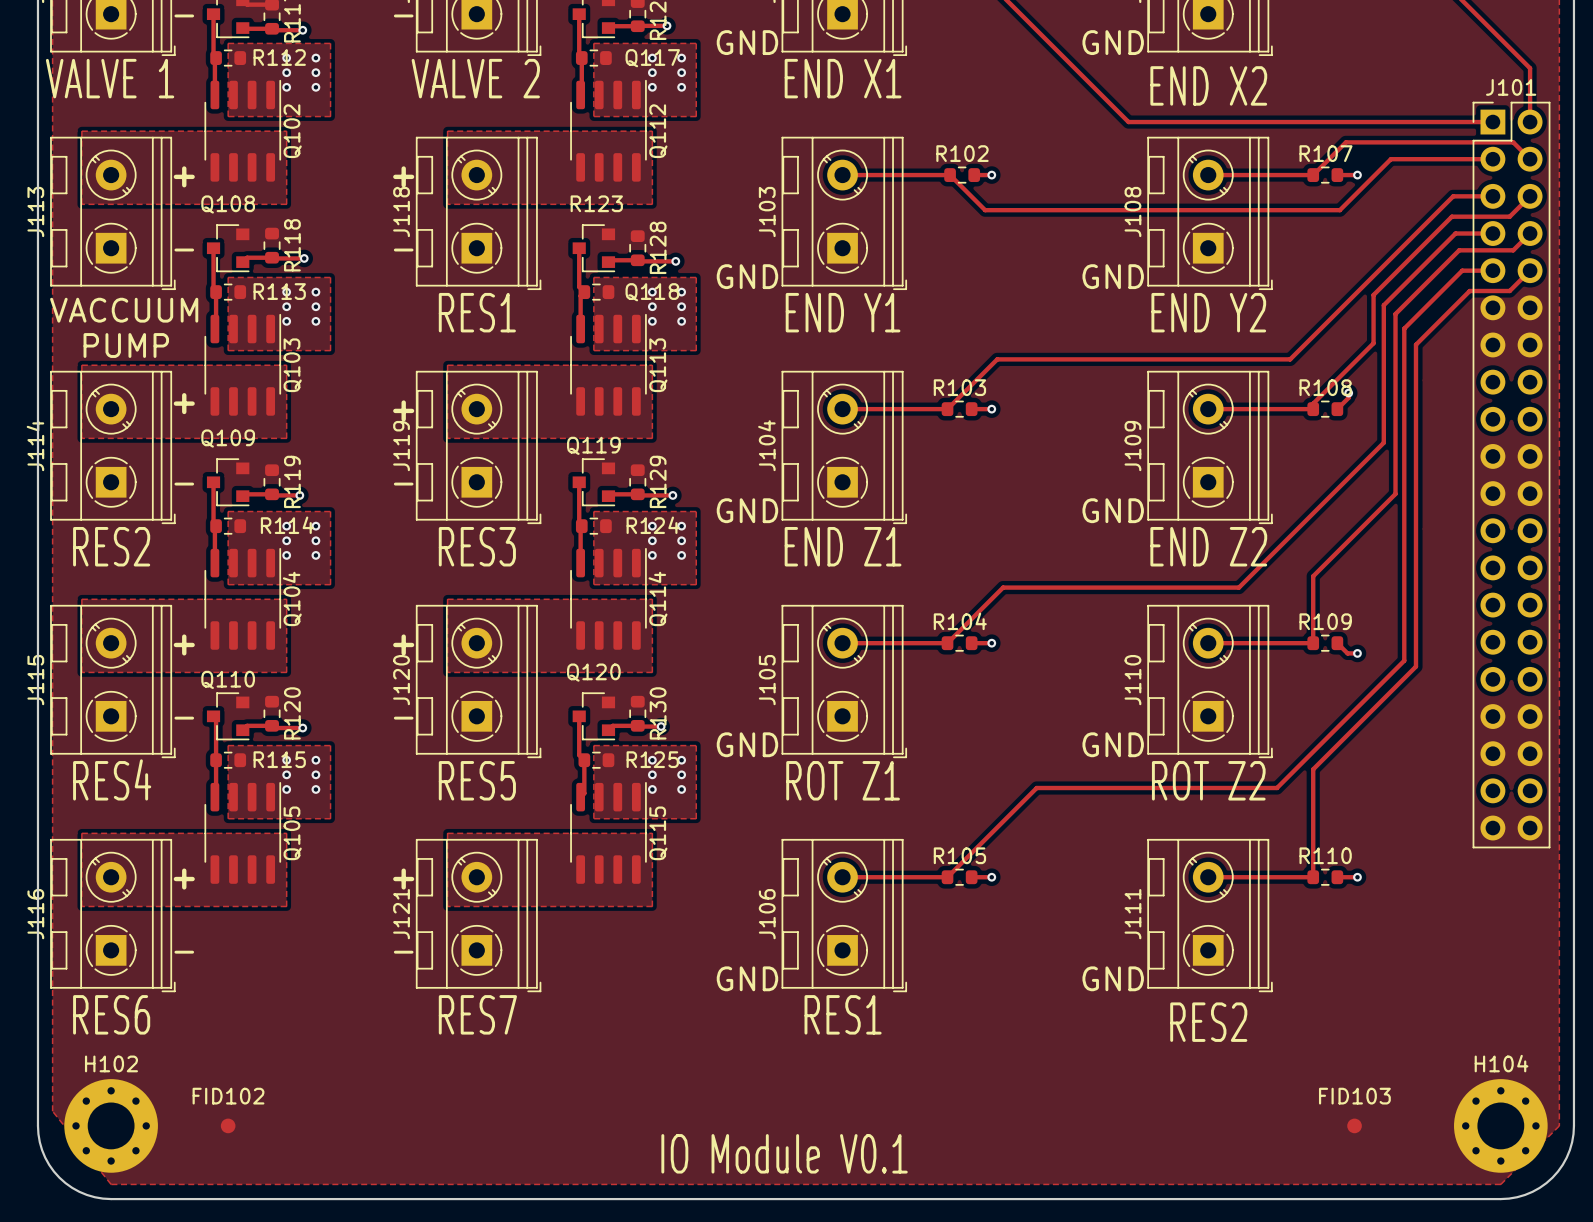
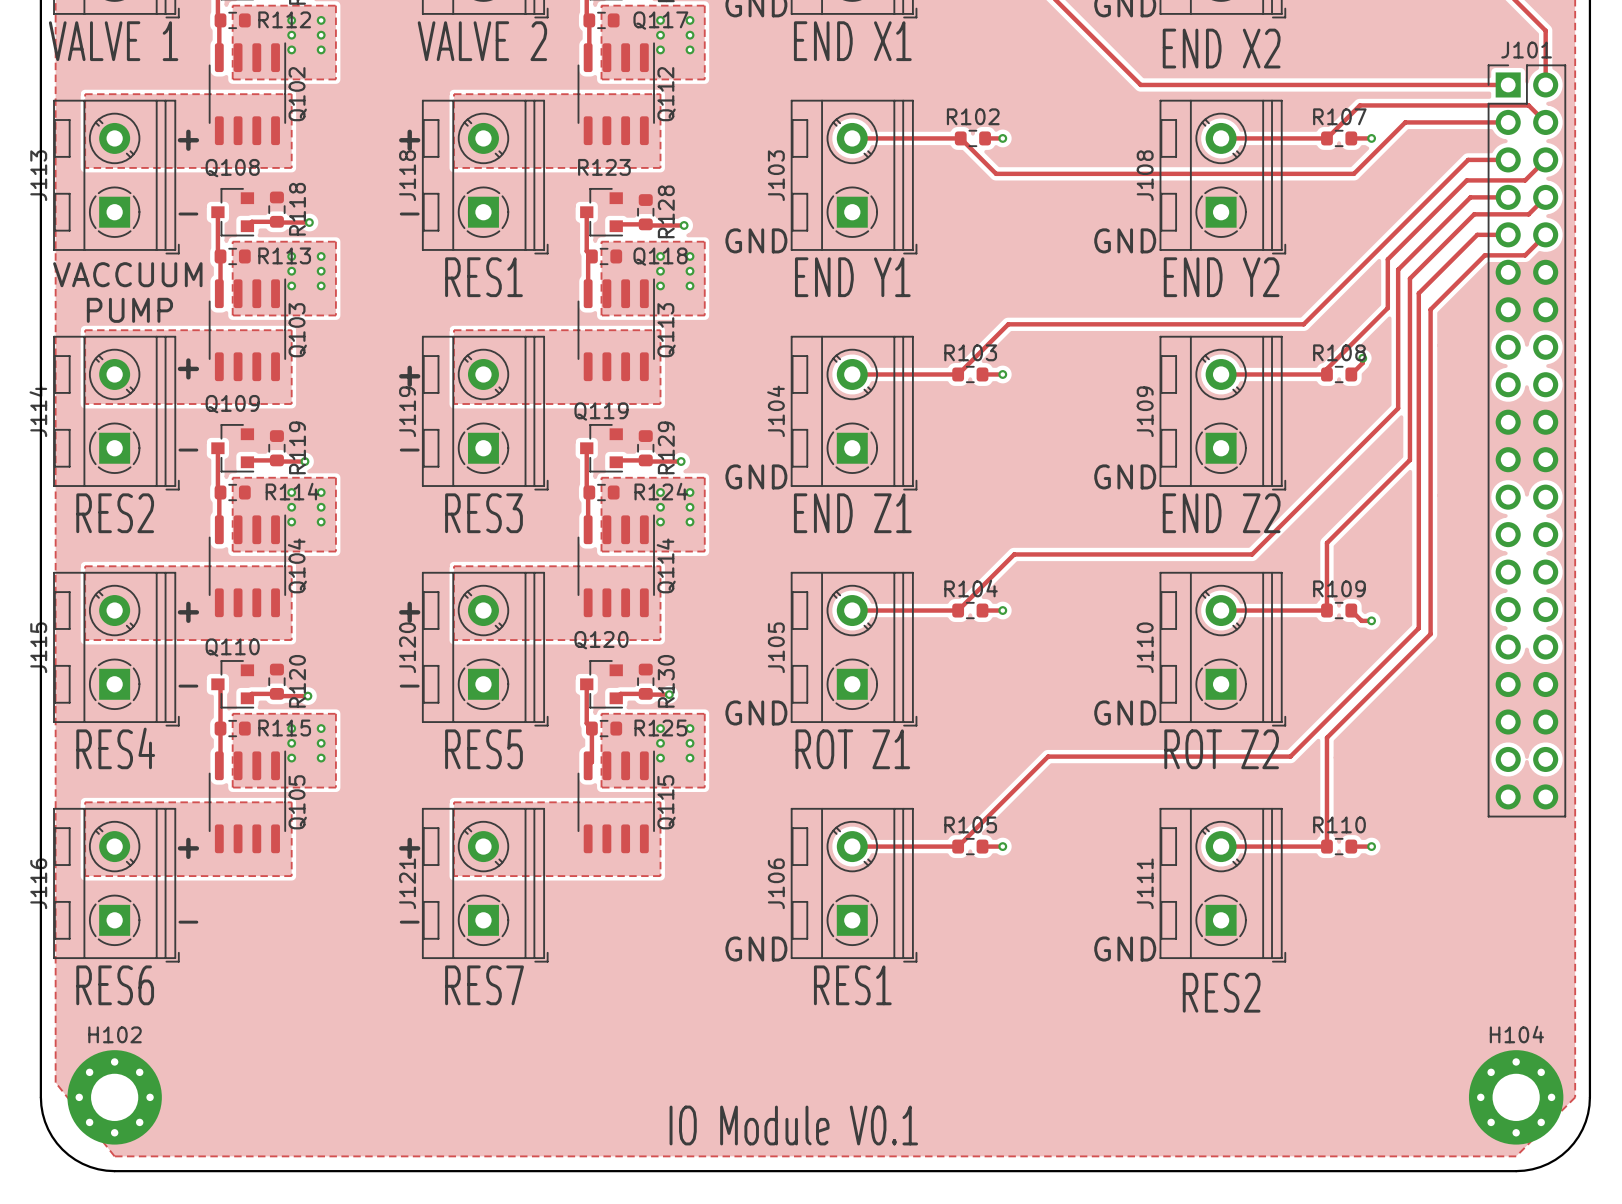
FID102: (228, 1125) -> none
FID103: (1354, 1125) -> none

